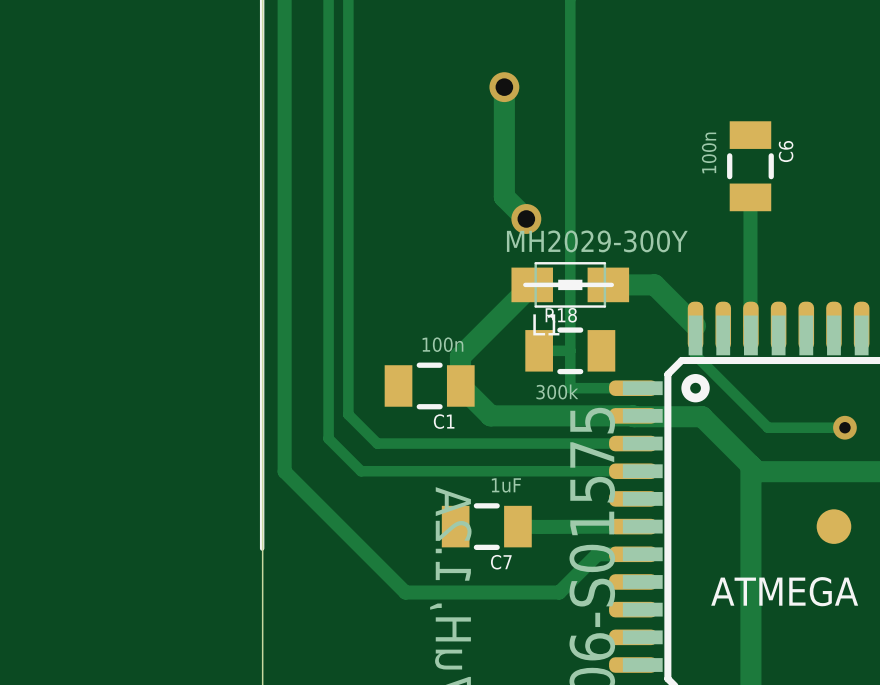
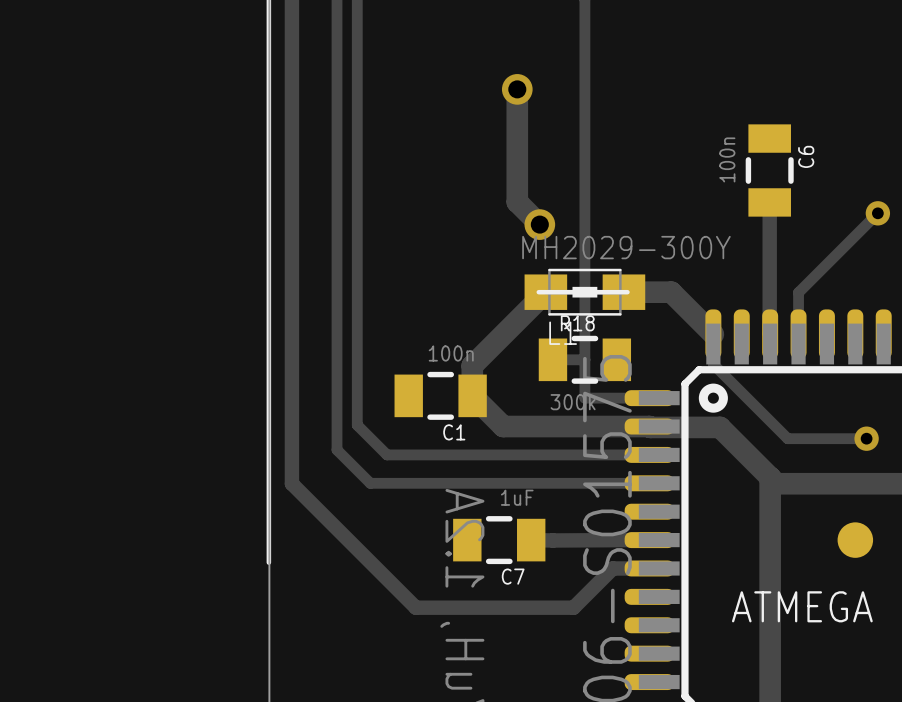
track: none -> (877, 213) (798, 292) (798, 334)
via: none -> (877, 213)

